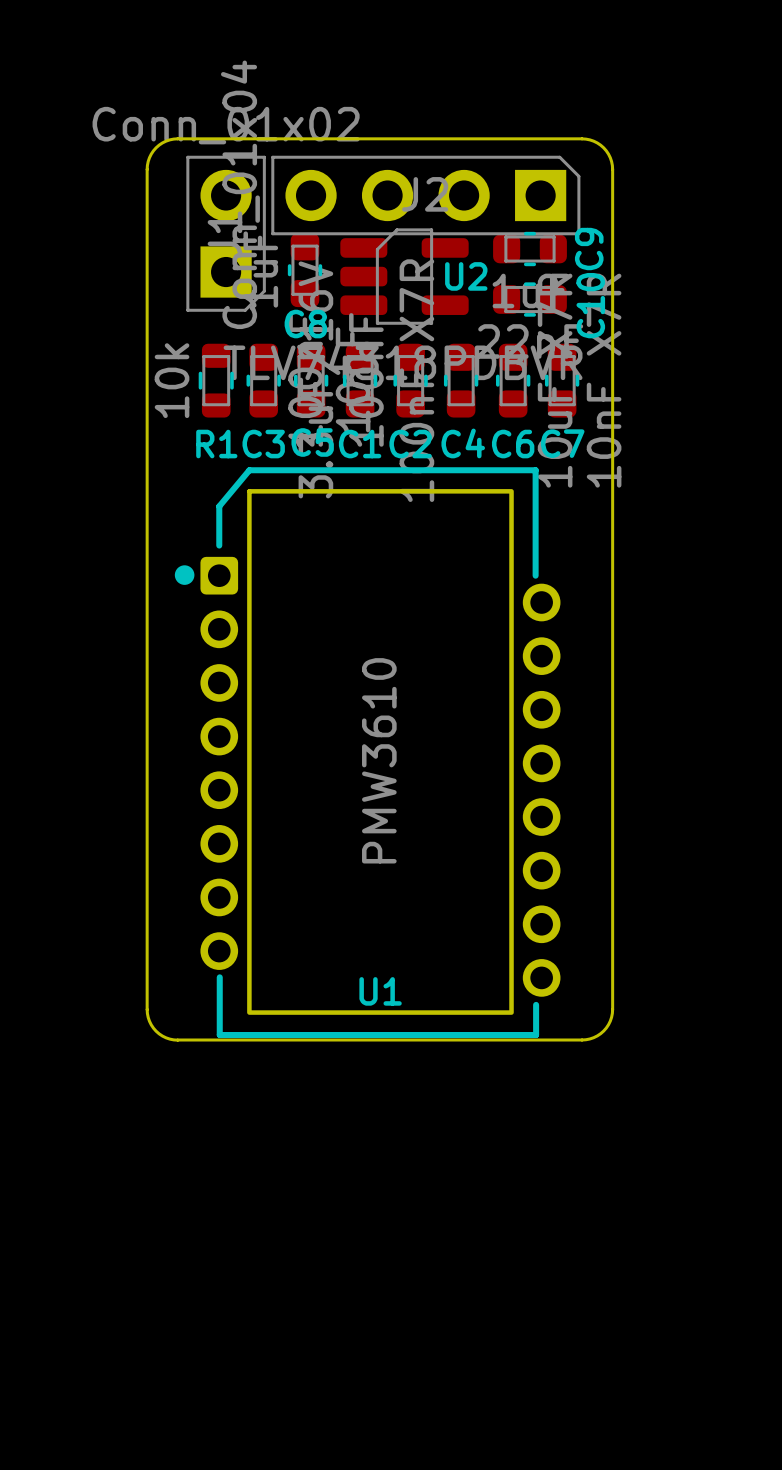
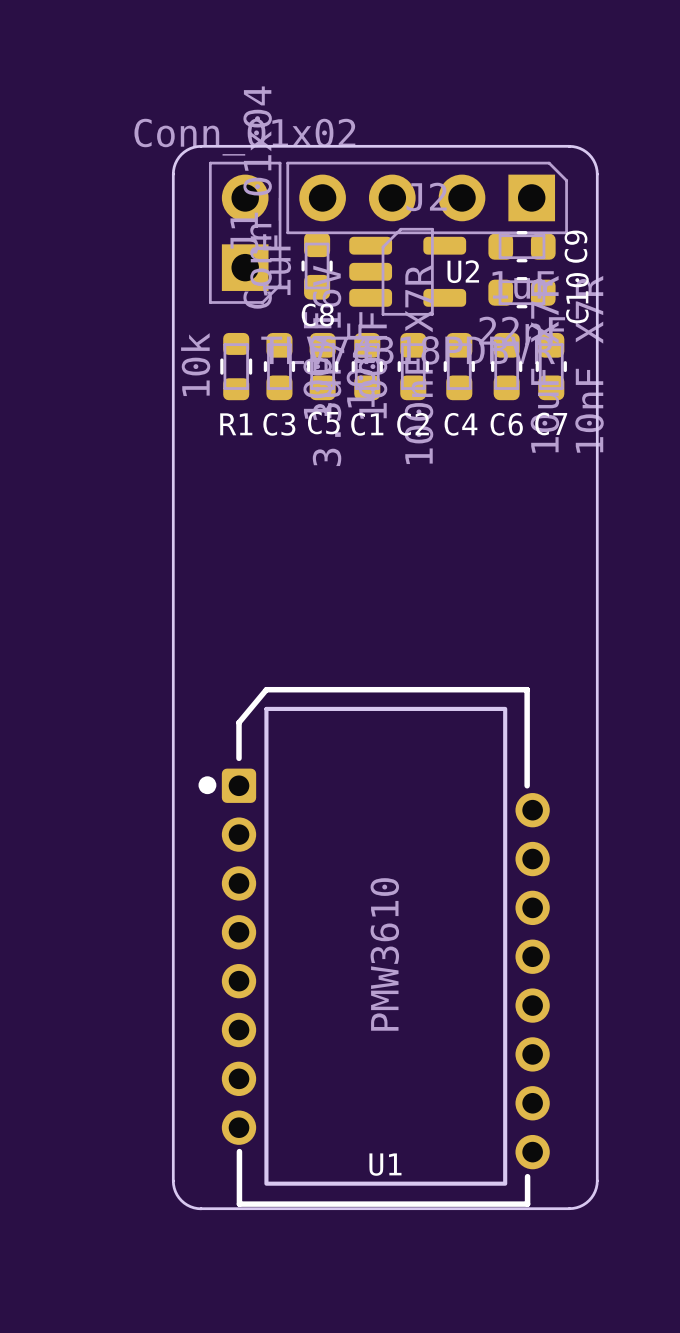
drawing position: (184, 575) -> (207, 785)
U1 position: (380, 752) -> (385, 946)
board edge: (147, 1009) (149, 1021) (156, 1031) (166, 1037) (177, 1040) -> (173, 939) (173, 1184) (181, 1200) (190, 1206) (201, 1208)
board edge: (612, 1009) (610, 1021) (603, 1031) (593, 1037) (586, 1039) (177, 1040) -> (597, 939) (597, 1180) (595, 1191) (586, 1202) (569, 1208) (201, 1208)

